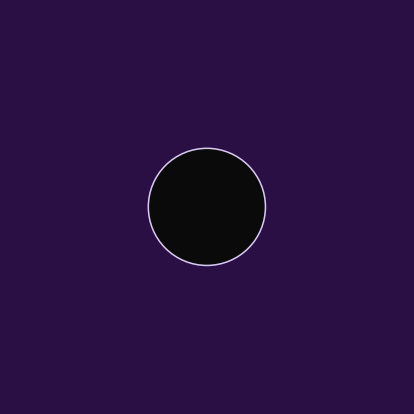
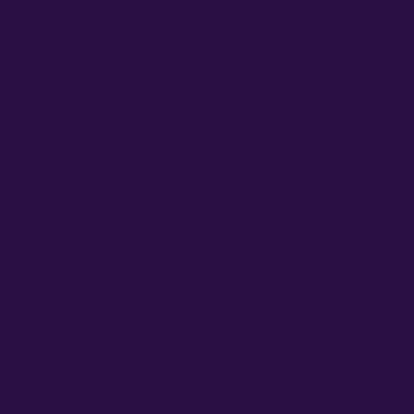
part: (206, 206) -> none

